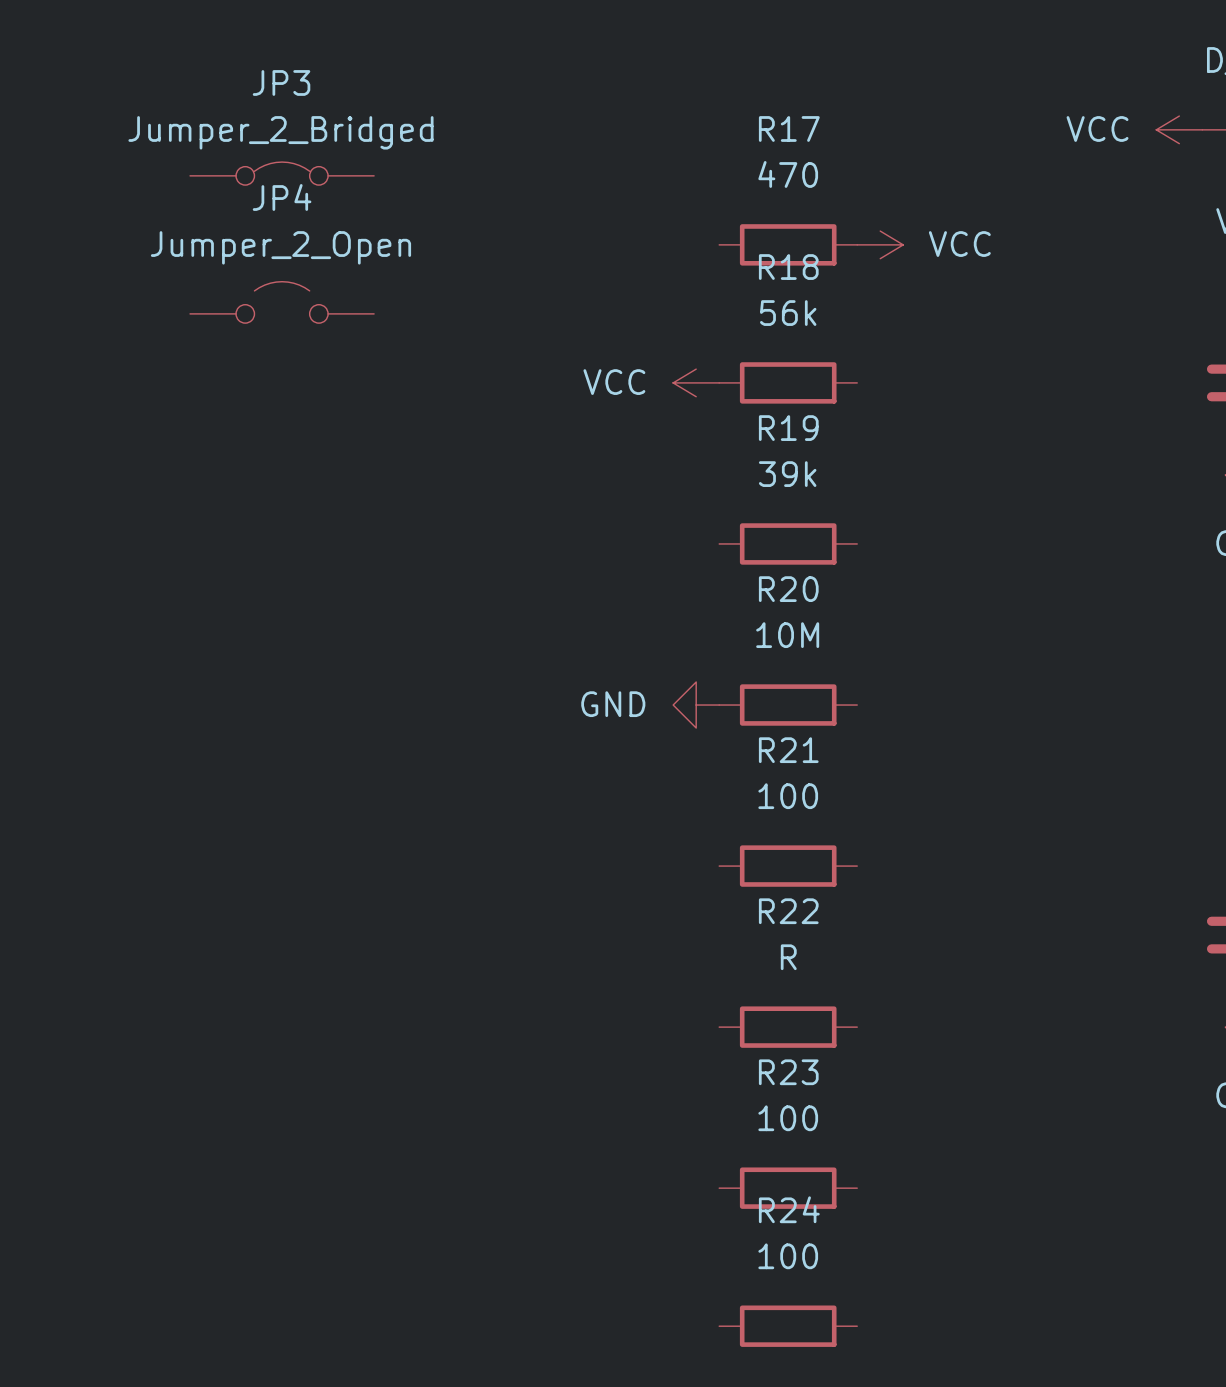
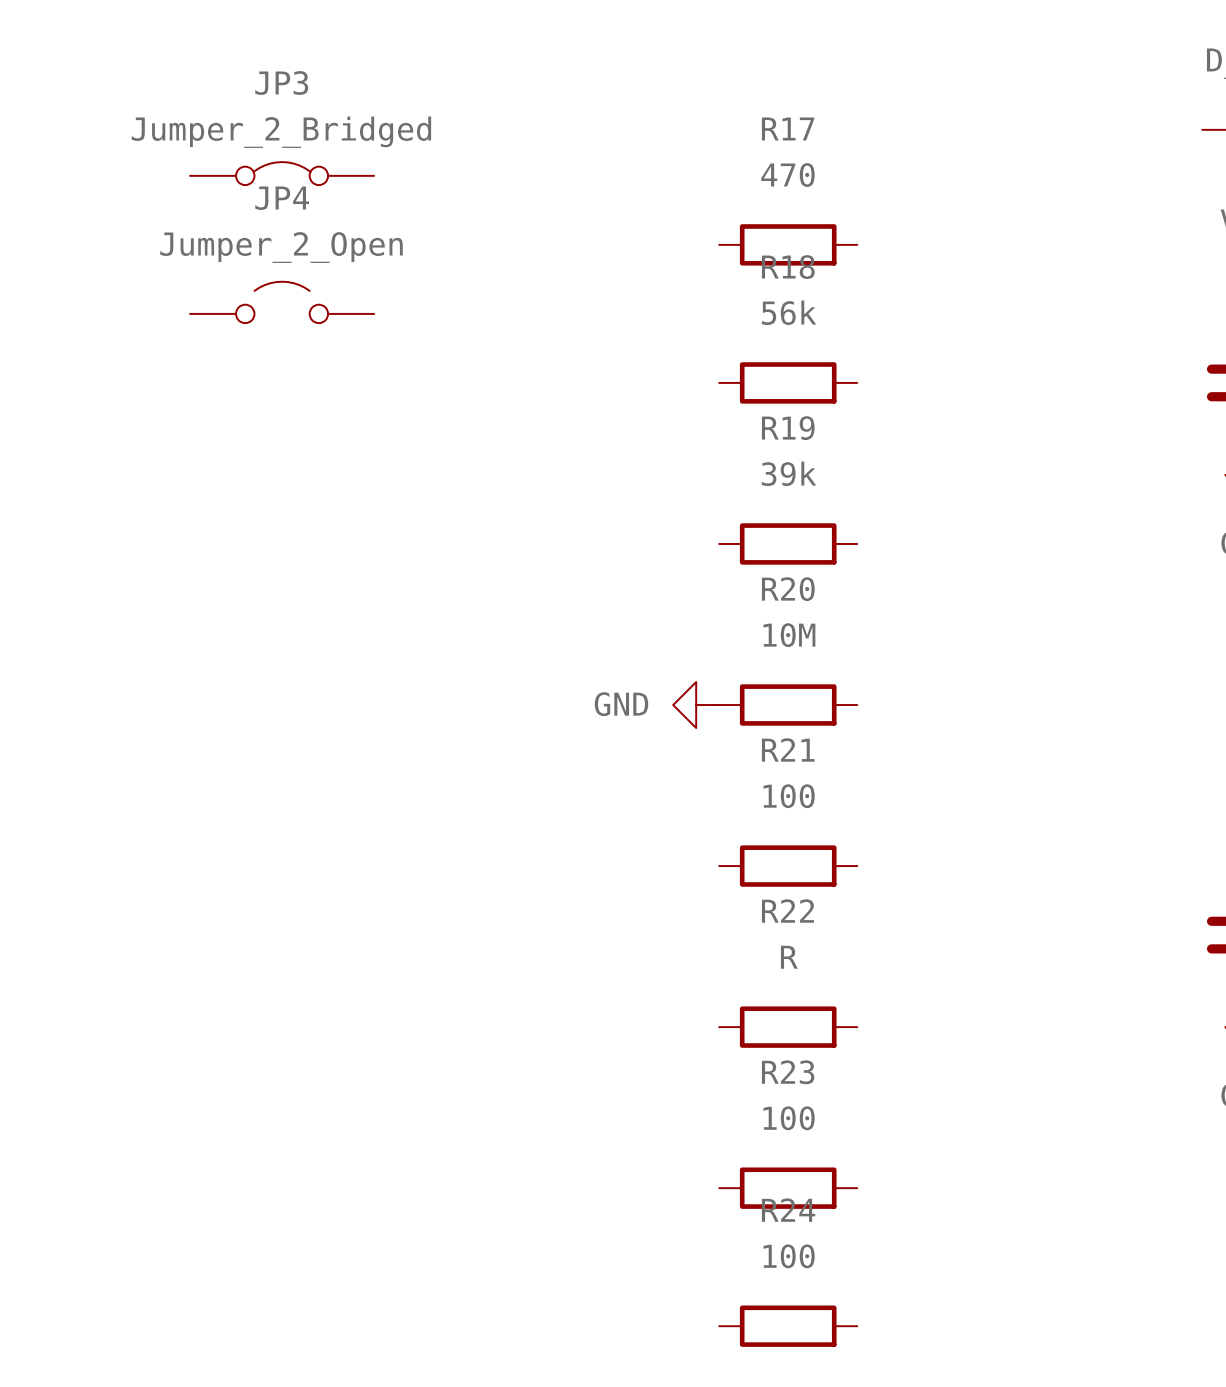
power symbol: VCC (1179, 129) -> none
power symbol: VCC (880, 244) -> none
power symbol: VCC (696, 382) -> none

